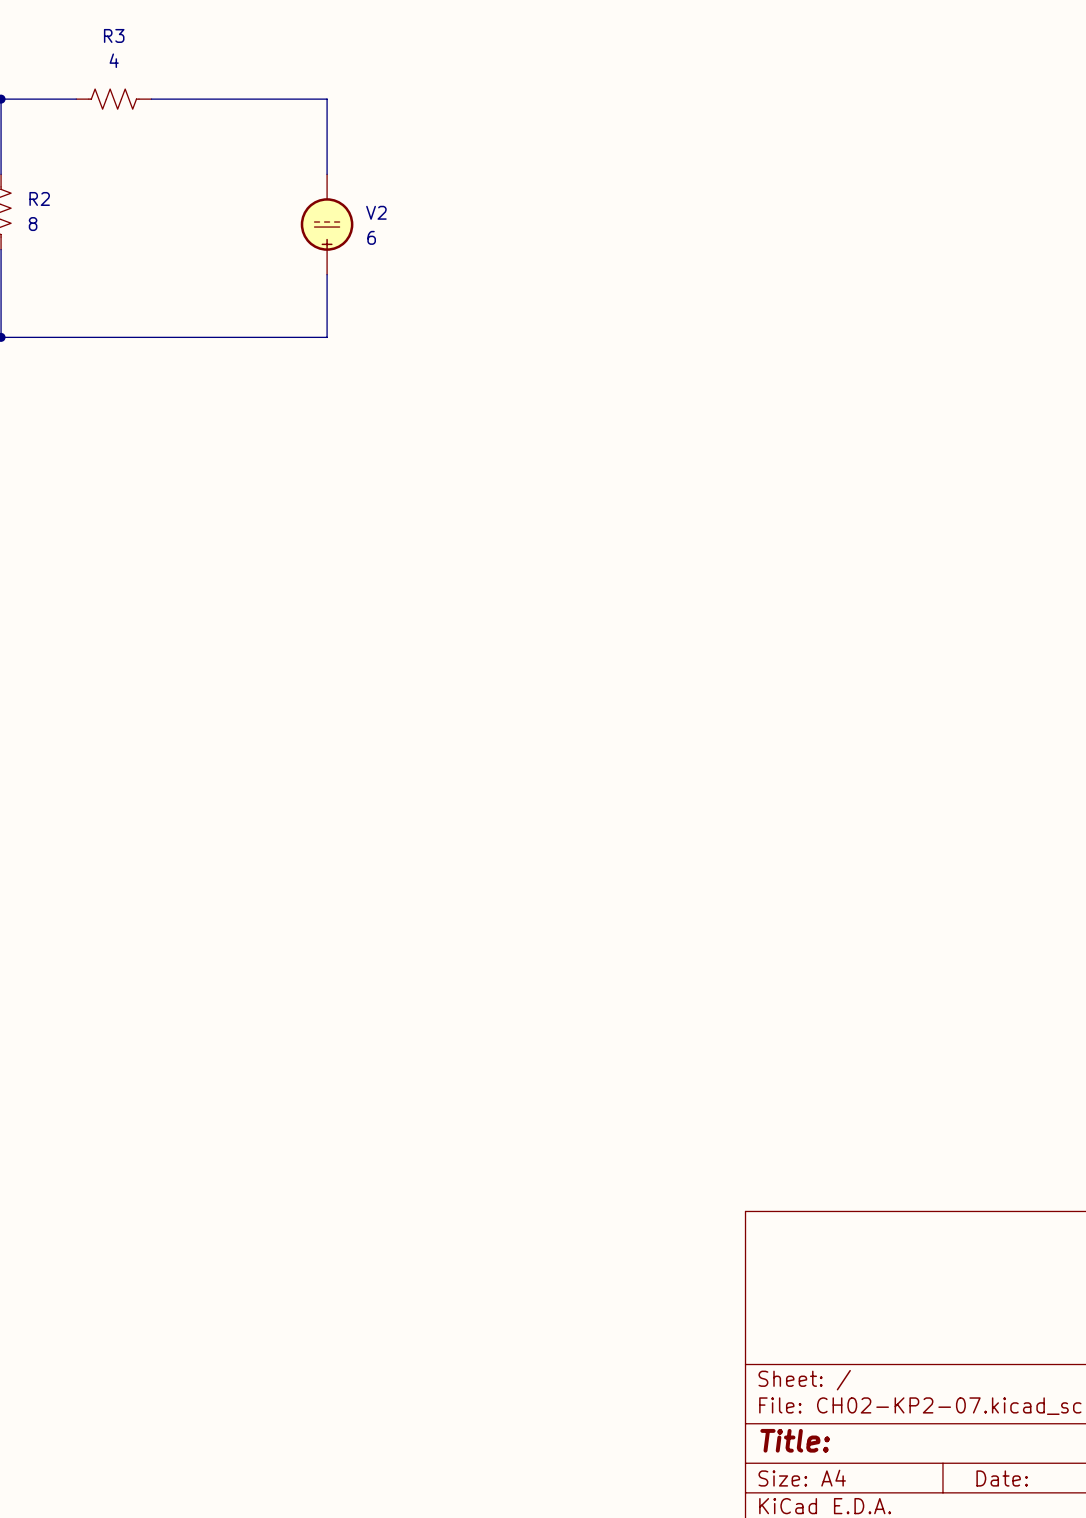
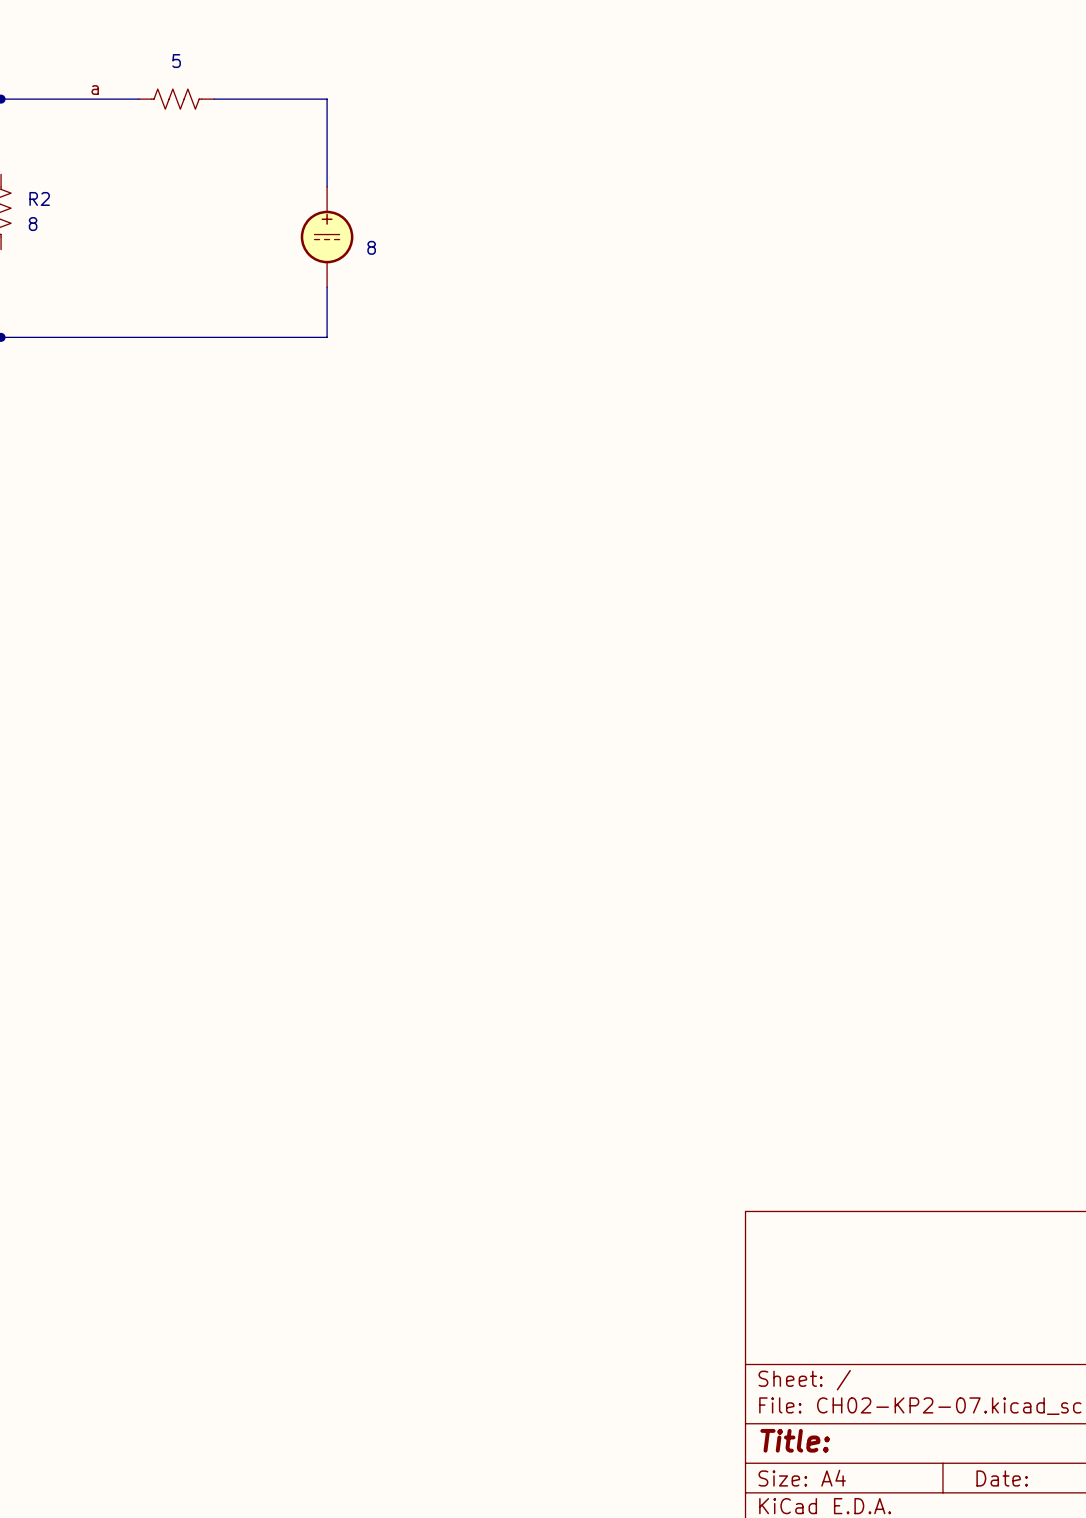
label: none -> a (95, 90)
wire: (1, 99) (1, 174) -> none
R3: 4 (113, 99) -> none
wire: (151, 99) (214, 99) -> (76, 99) (138, 99)
part: none -> 5 (176, 99)
V2: 6 (327, 224) -> none
part: none -> 8 (327, 237)
wire: (1, 249) (1, 337) -> none

